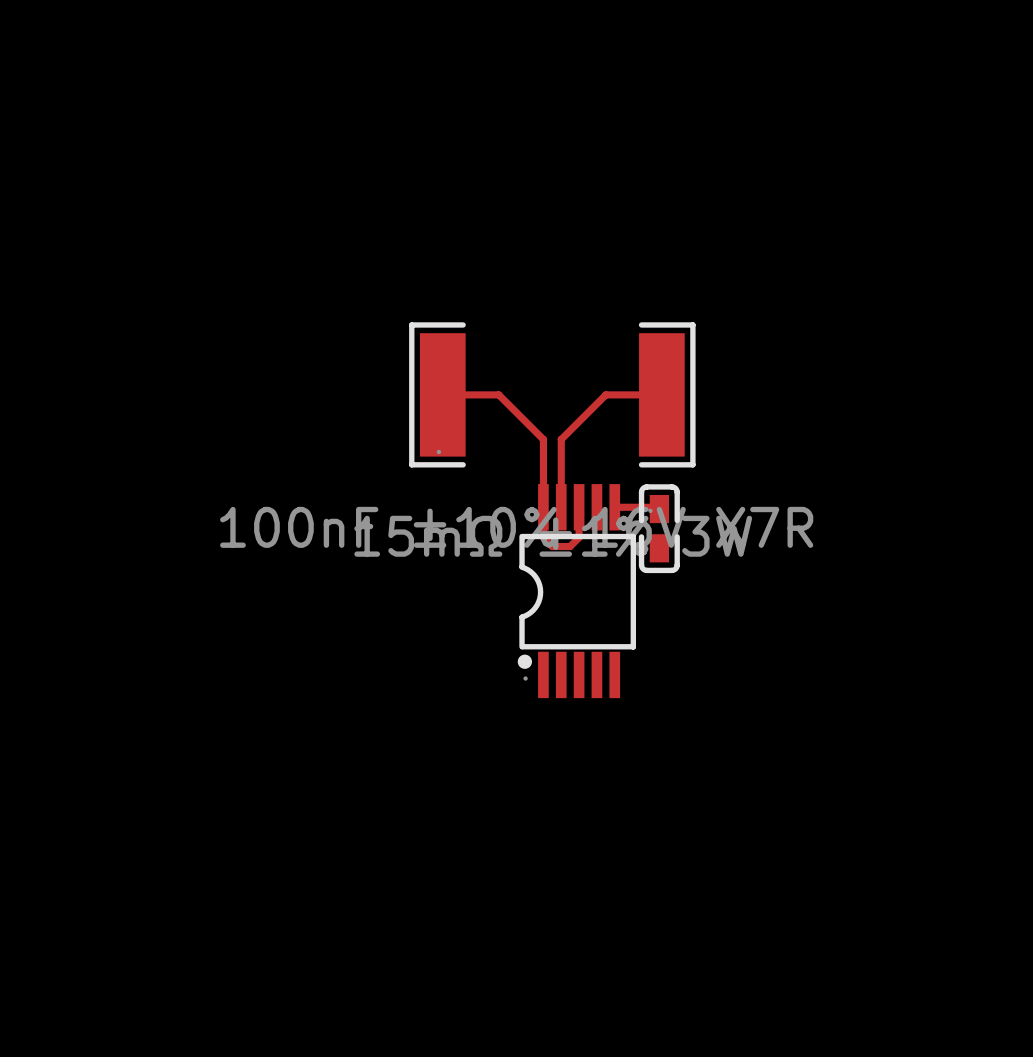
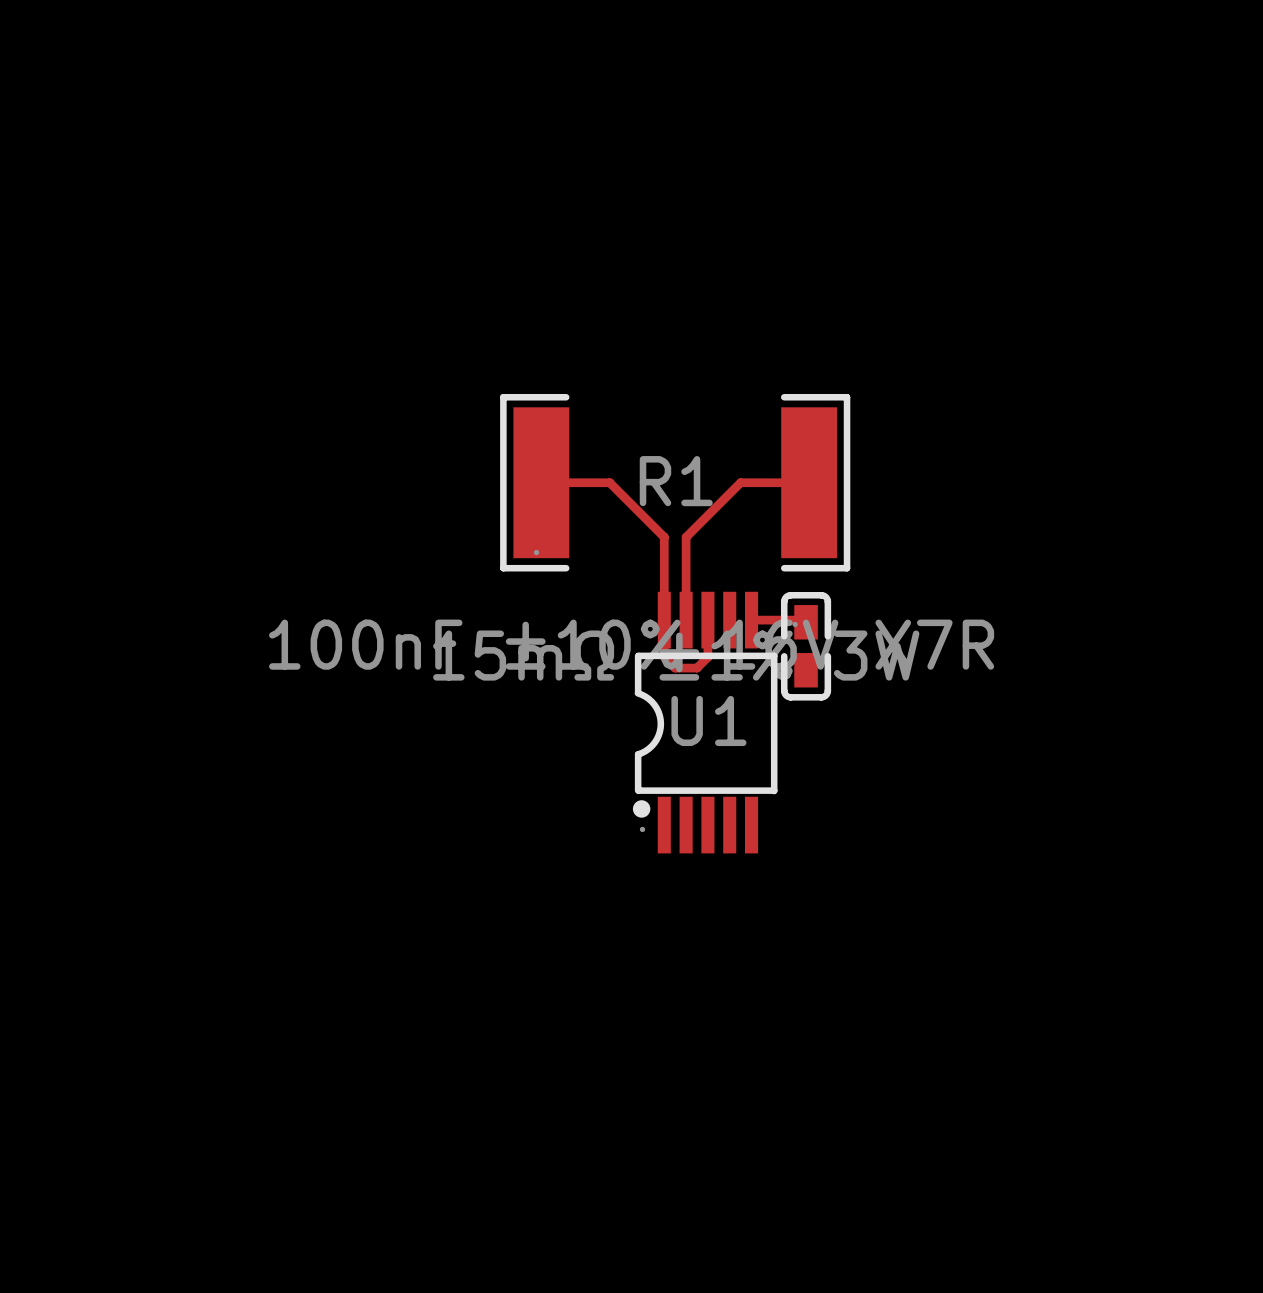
R1 name: none -> R1 (676, 481)
U1 name: none -> U1 (708, 720)

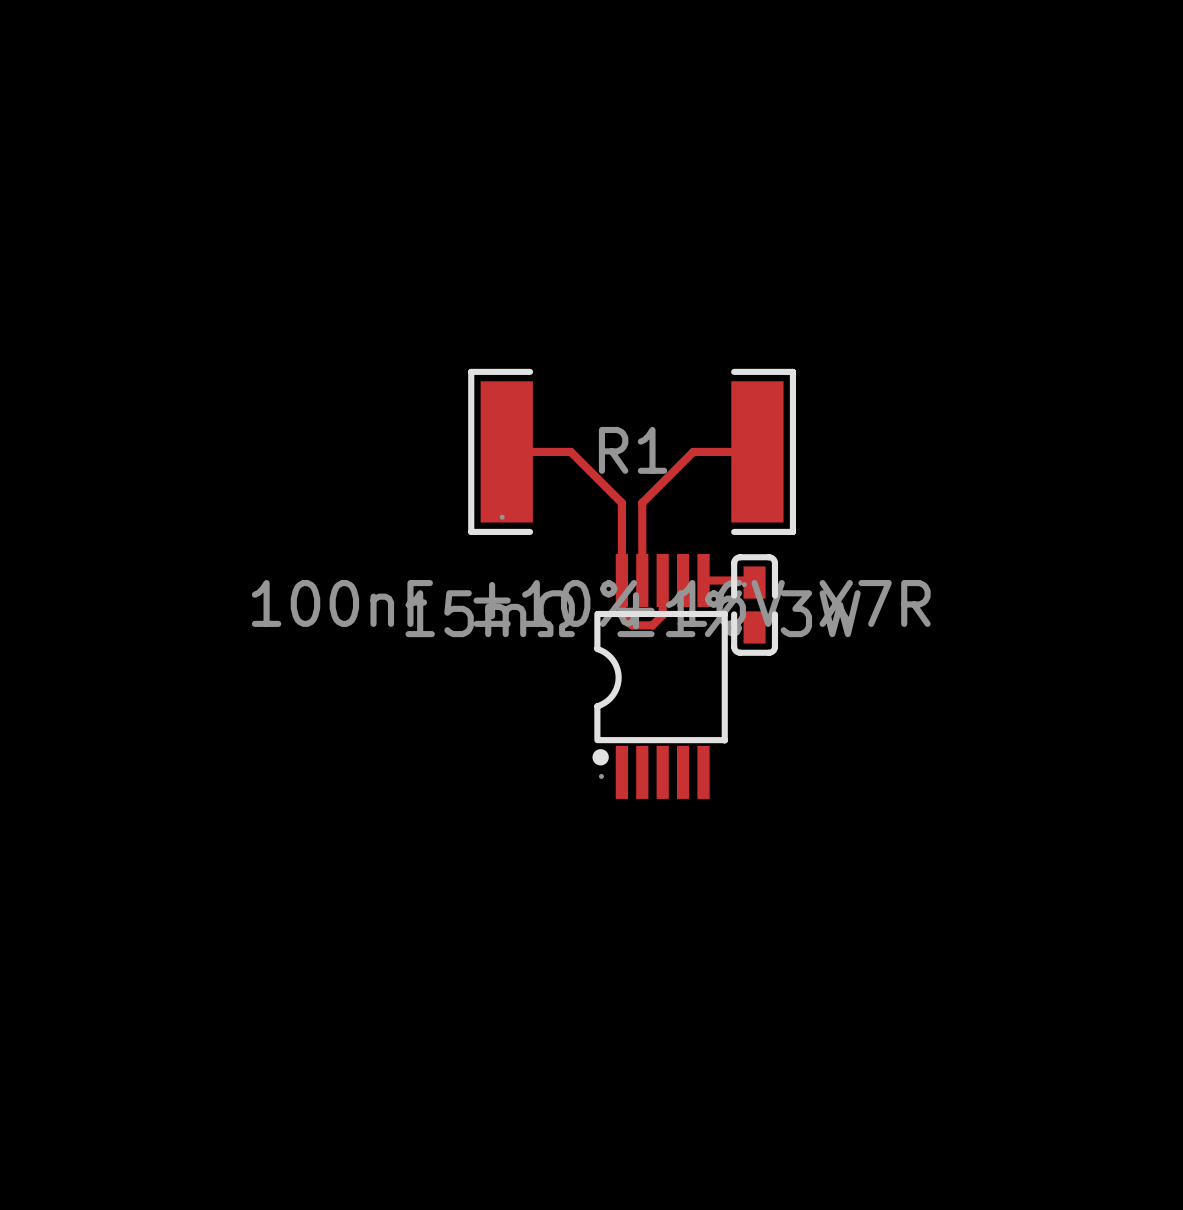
U1 name: U1 (708, 720) -> none

